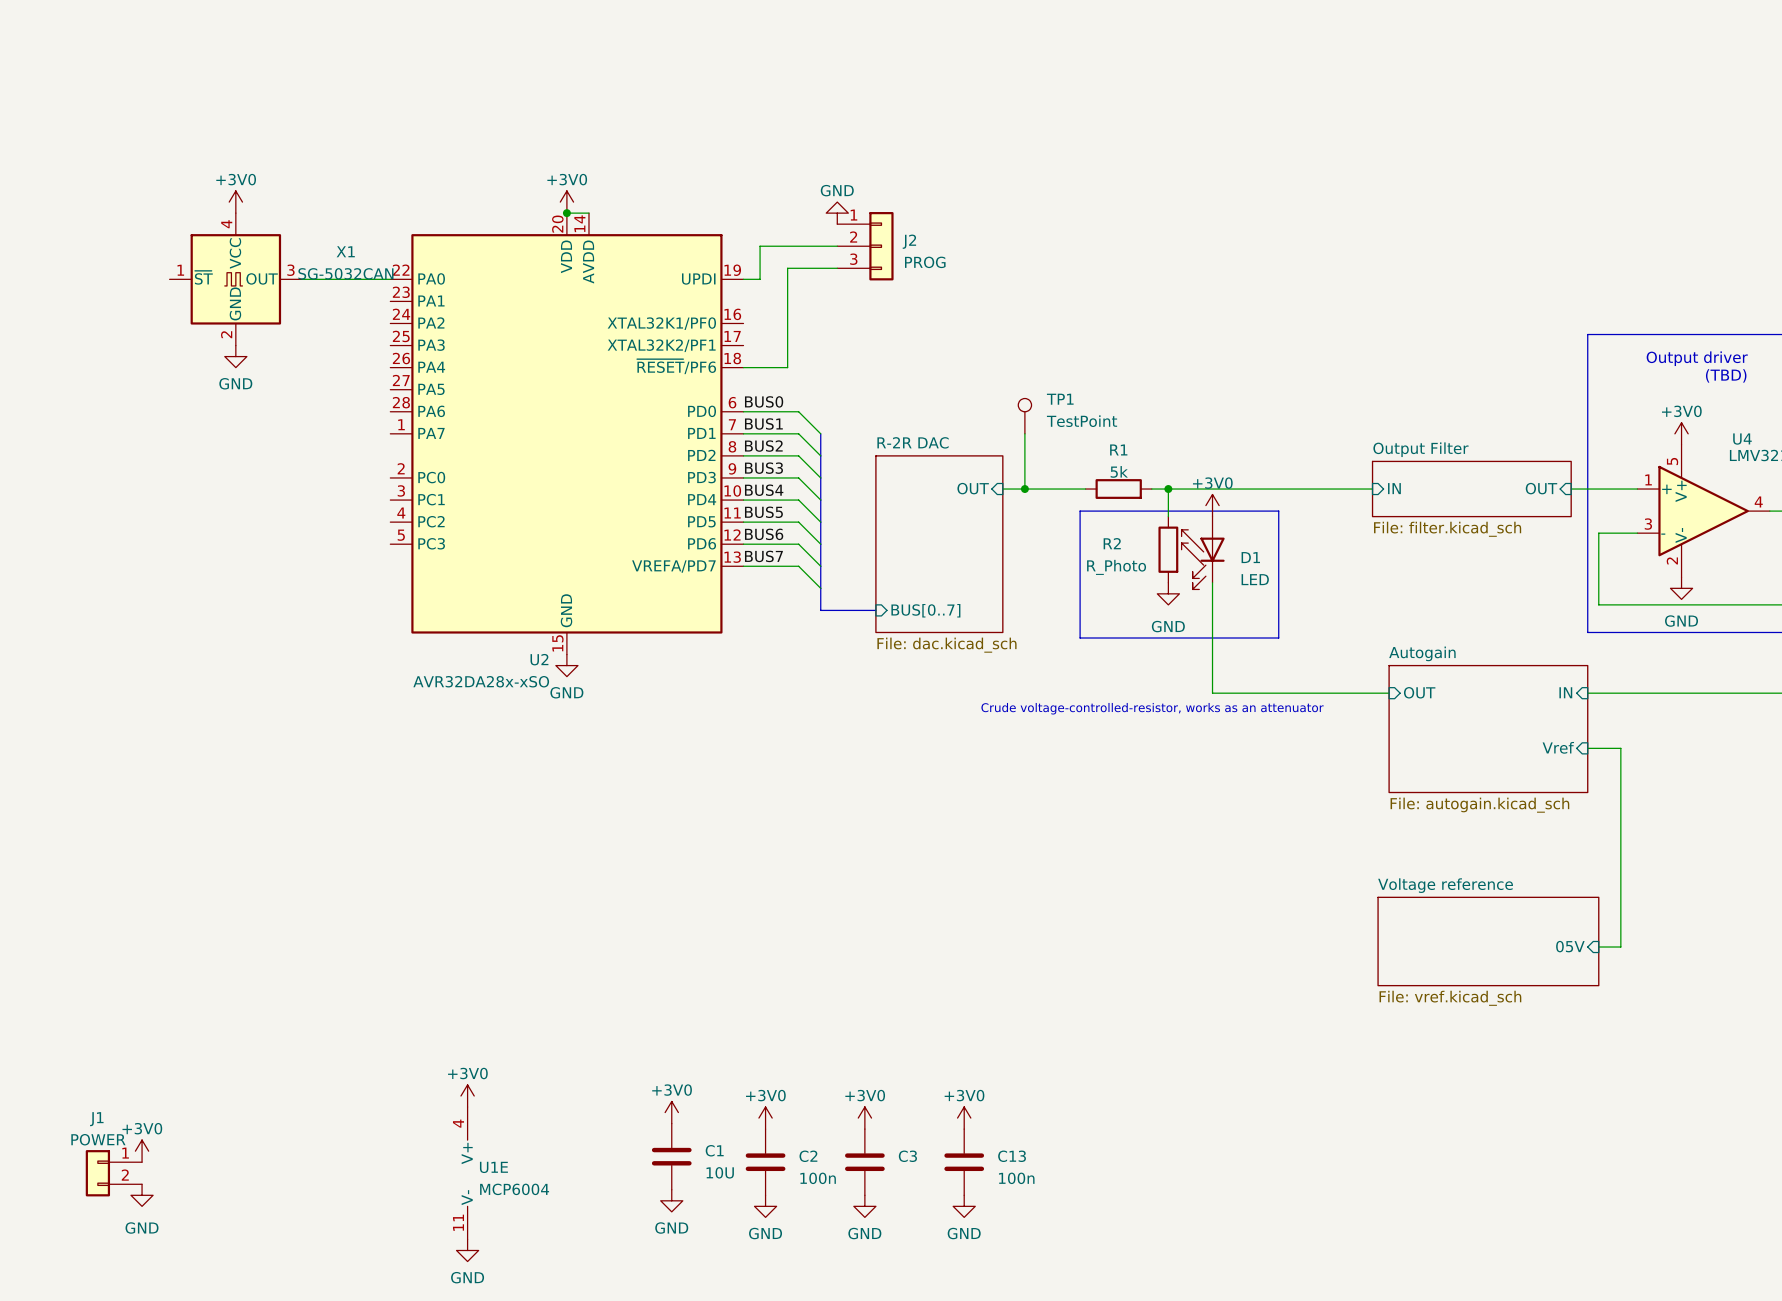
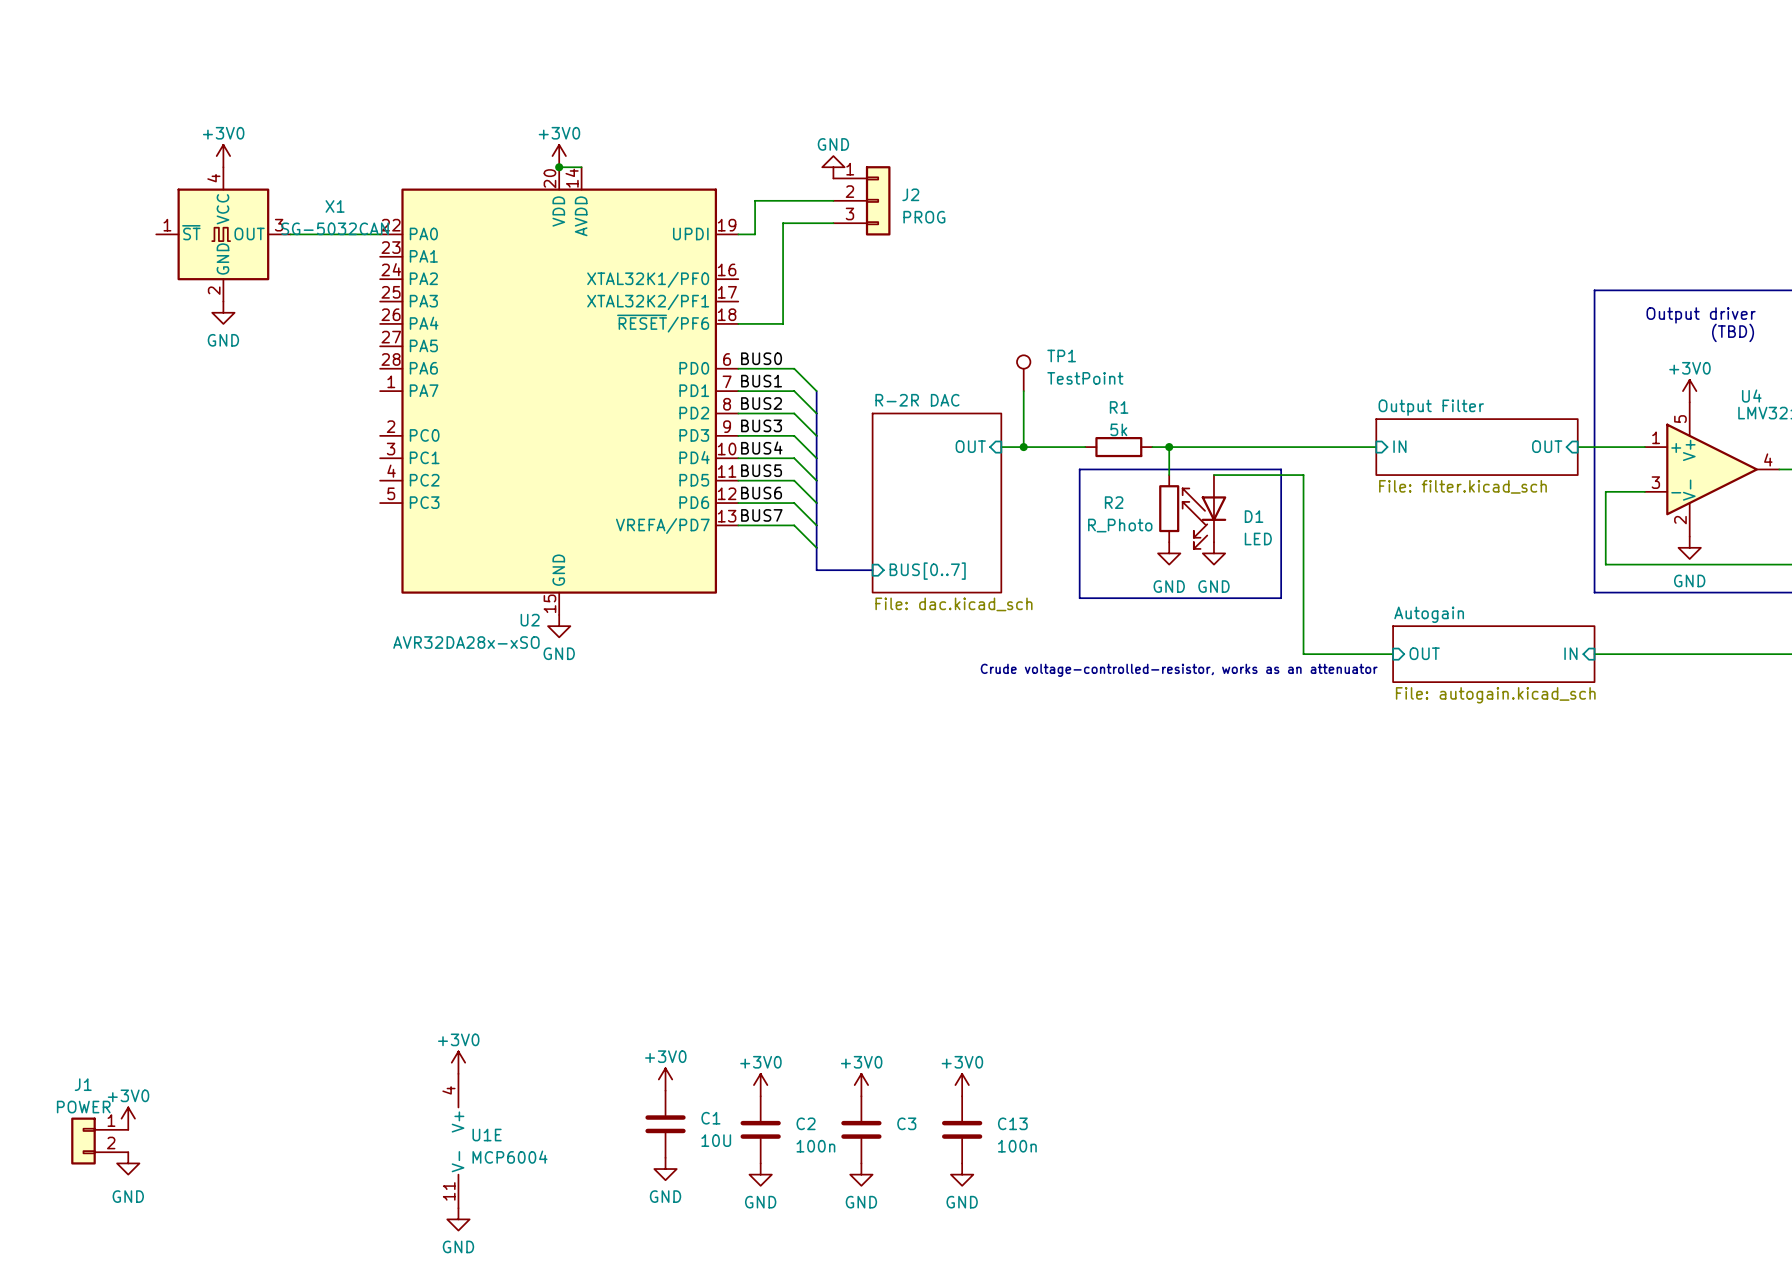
power symbol: +3V0 (1212, 505) -> none
wire: (1212, 582) (1212, 693) (1300, 693) -> (1213, 475) (1303, 475) (1303, 654)
power symbol: none -> GND (1213, 553)
sheet Autogain: none -> File: autogain.kicad_sch (1493, 654)
sheet Autogain: File: autogain.kicad_sch (1488, 729) -> none
sheet pin: Vref (1558, 747) -> none
wire: (1587, 748) (1620, 748) (1620, 947) (1598, 947) -> none
sheet Voltage reference: File: vref.kicad_sch (1488, 941) -> none
sheet pin: 05V (1570, 946) -> none

